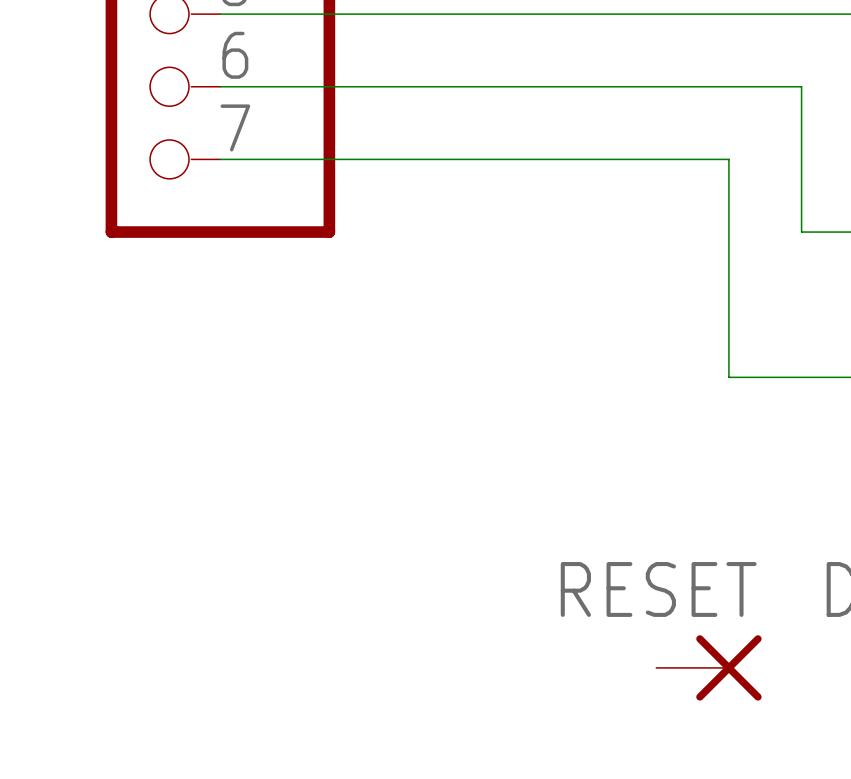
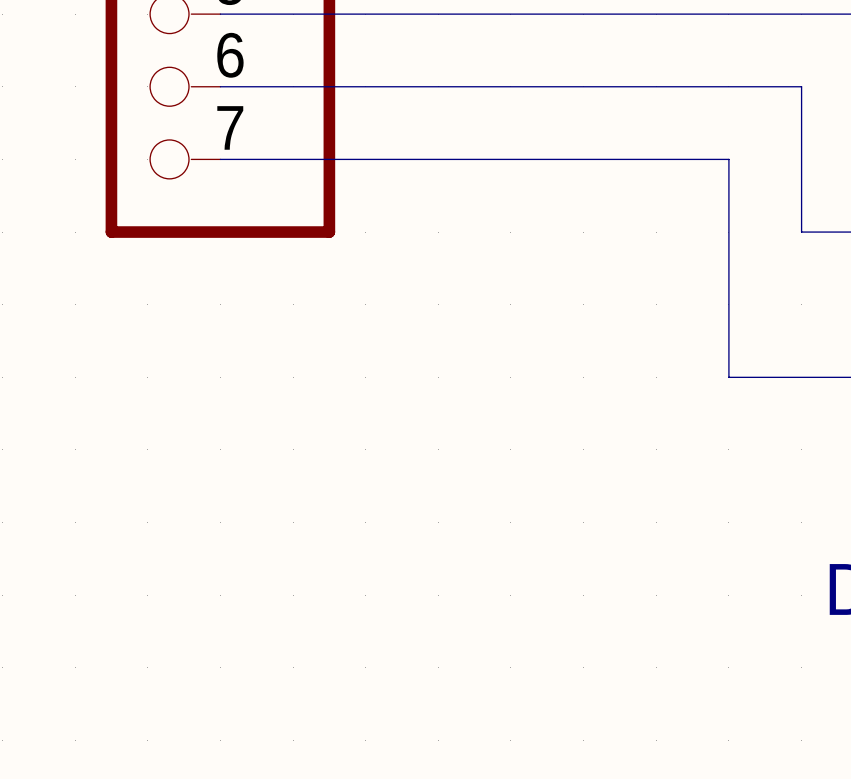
RESET: (708, 667) -> none

